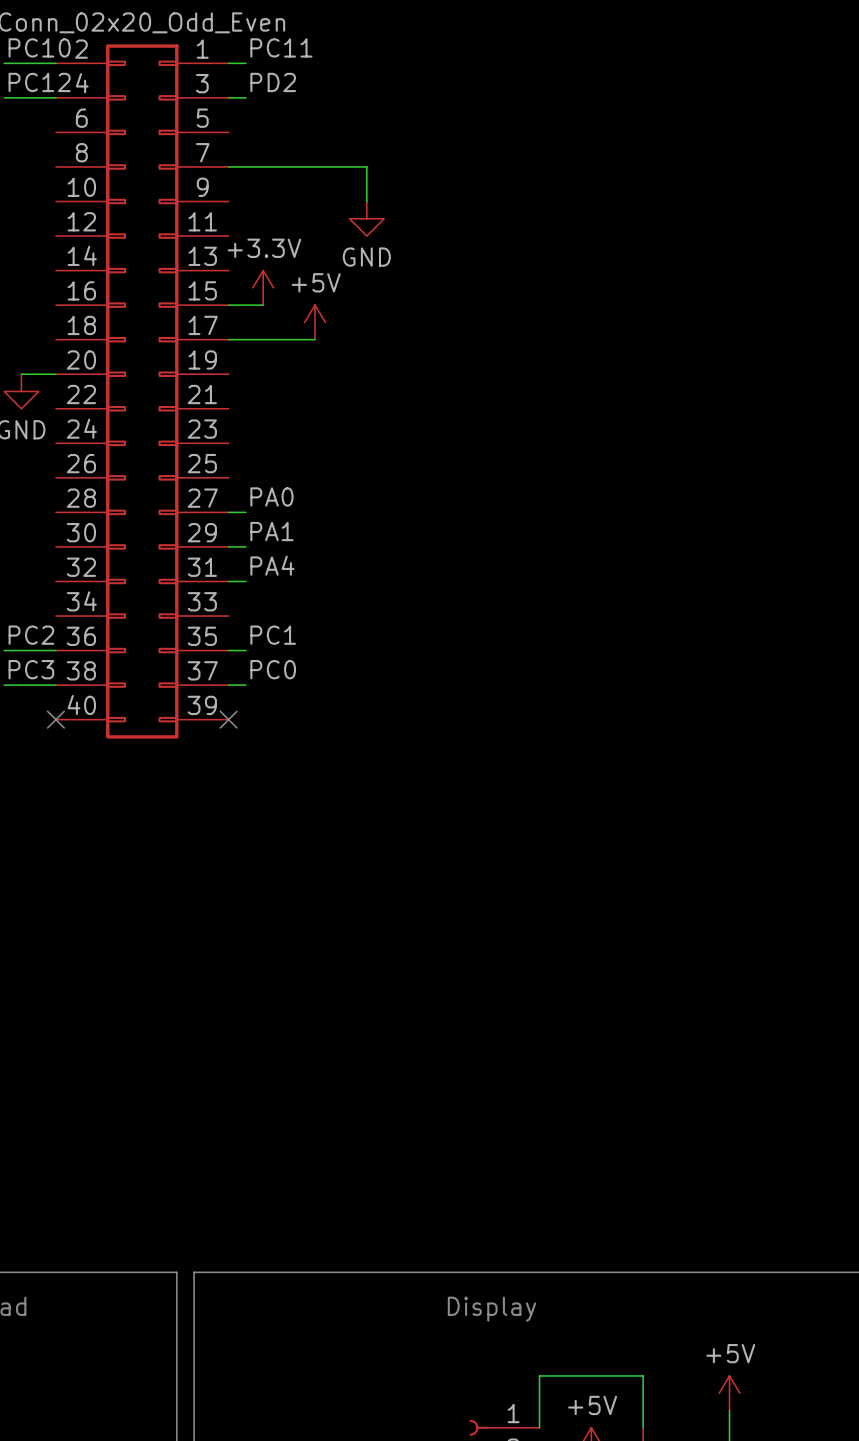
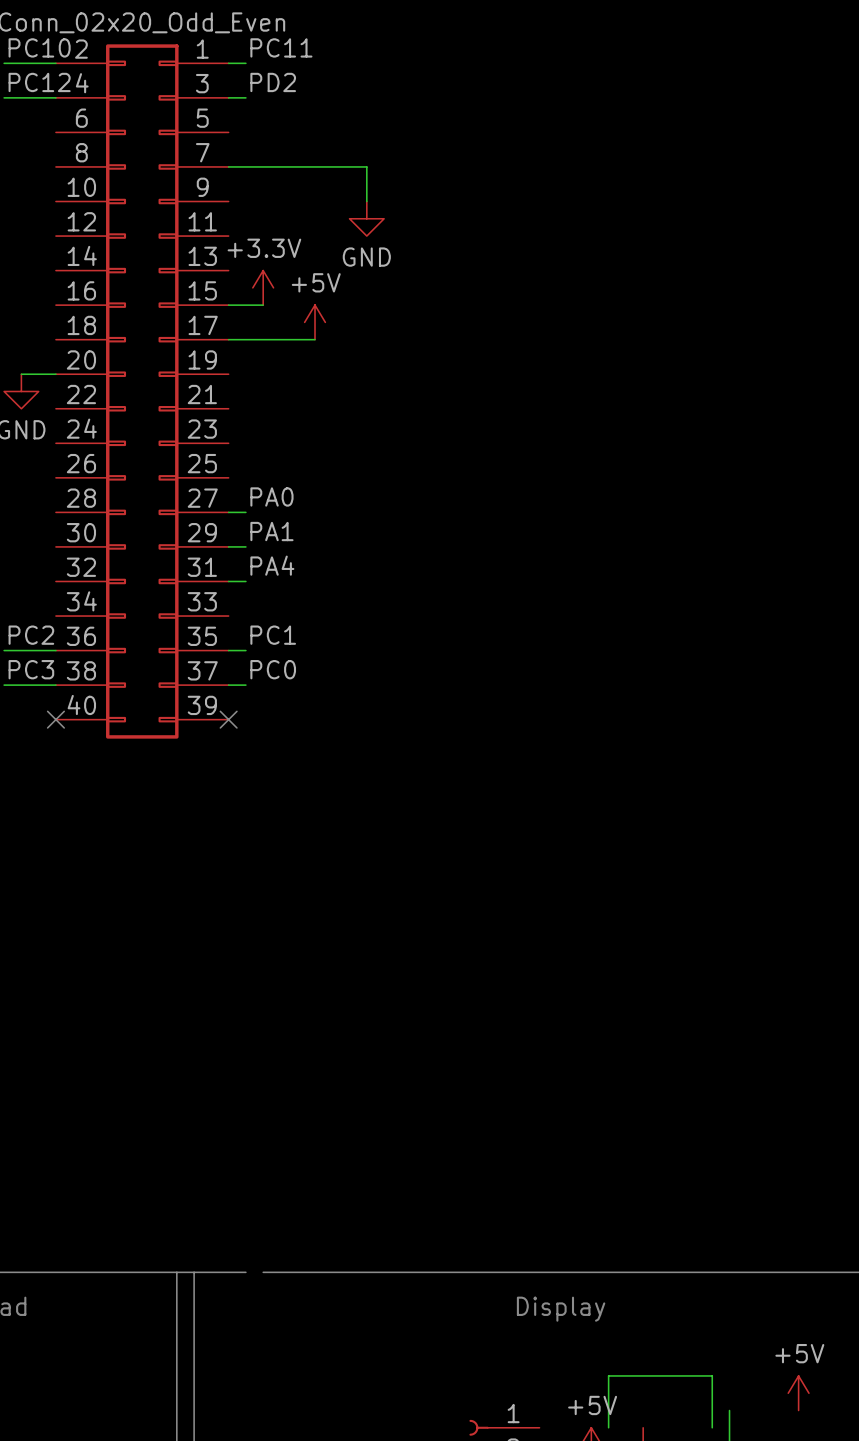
line: (245, 1272) (263, 1272) -> (176, 1272) (194, 1272)
text position: Display (491, 1309) -> Display (561, 1309)
wire: (608, 1375) (539, 1375) (539, 1427) -> (608, 1375) (608, 1427)
wire: (643, 1375) (643, 1427) -> (643, 1375) (712, 1375) (712, 1427)
power symbol position: +5V (729, 1393) -> +5V (798, 1393)

